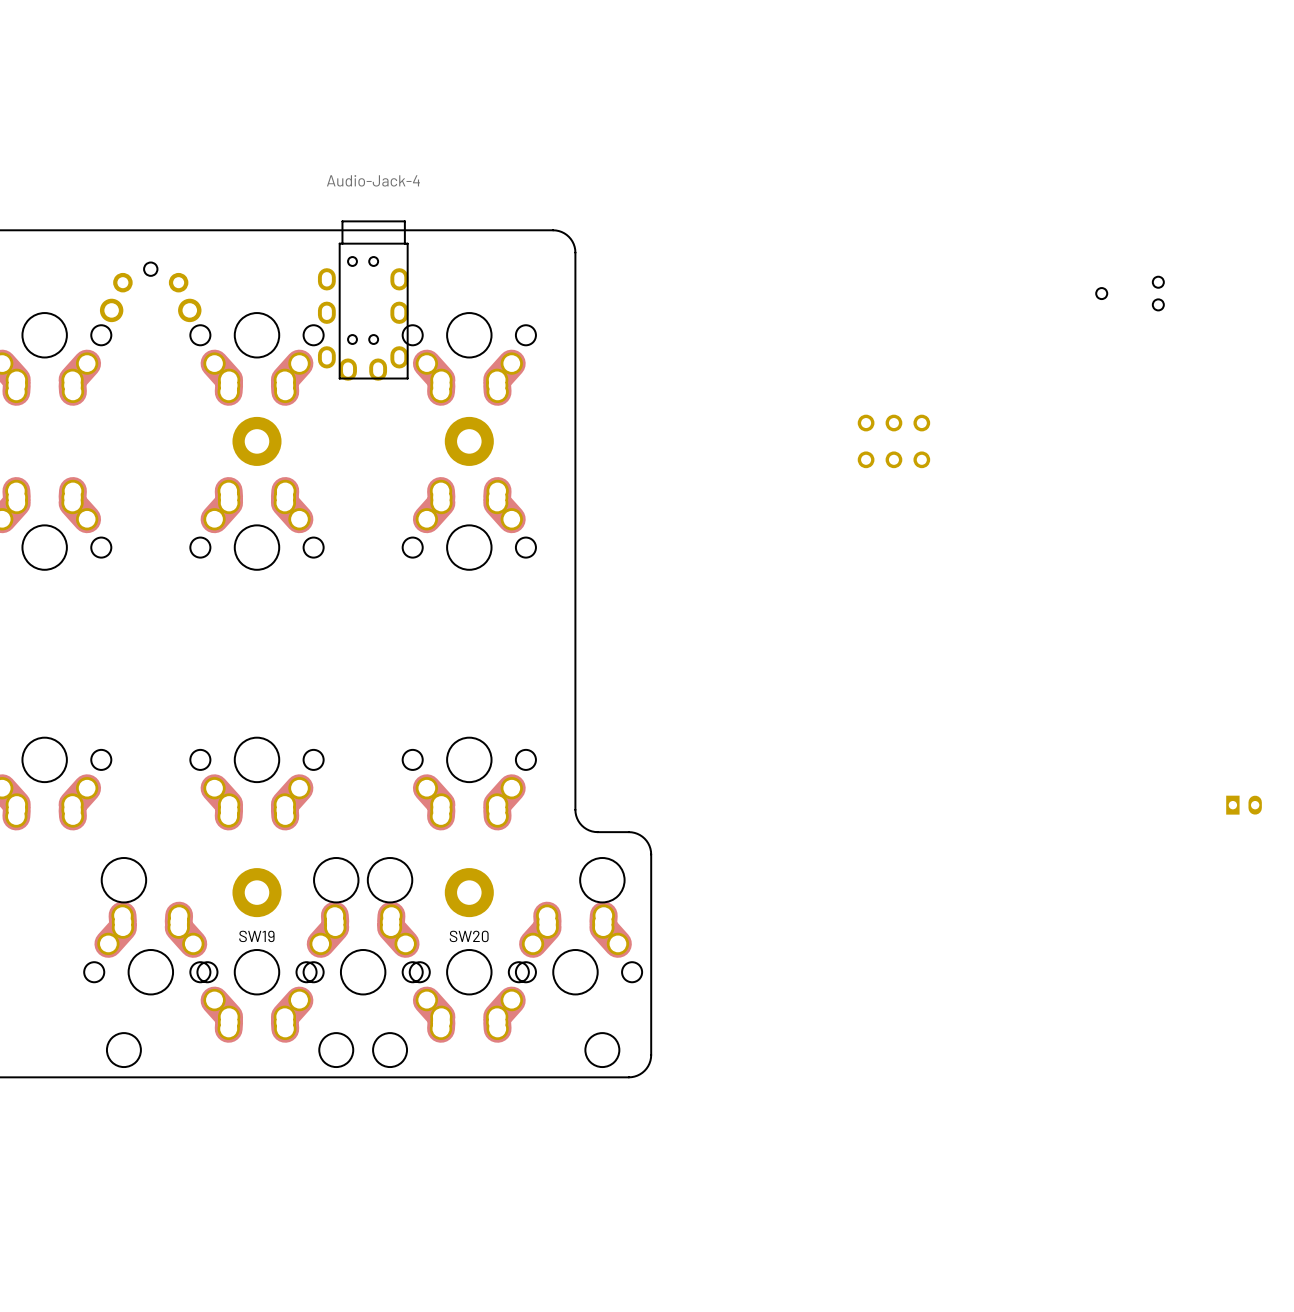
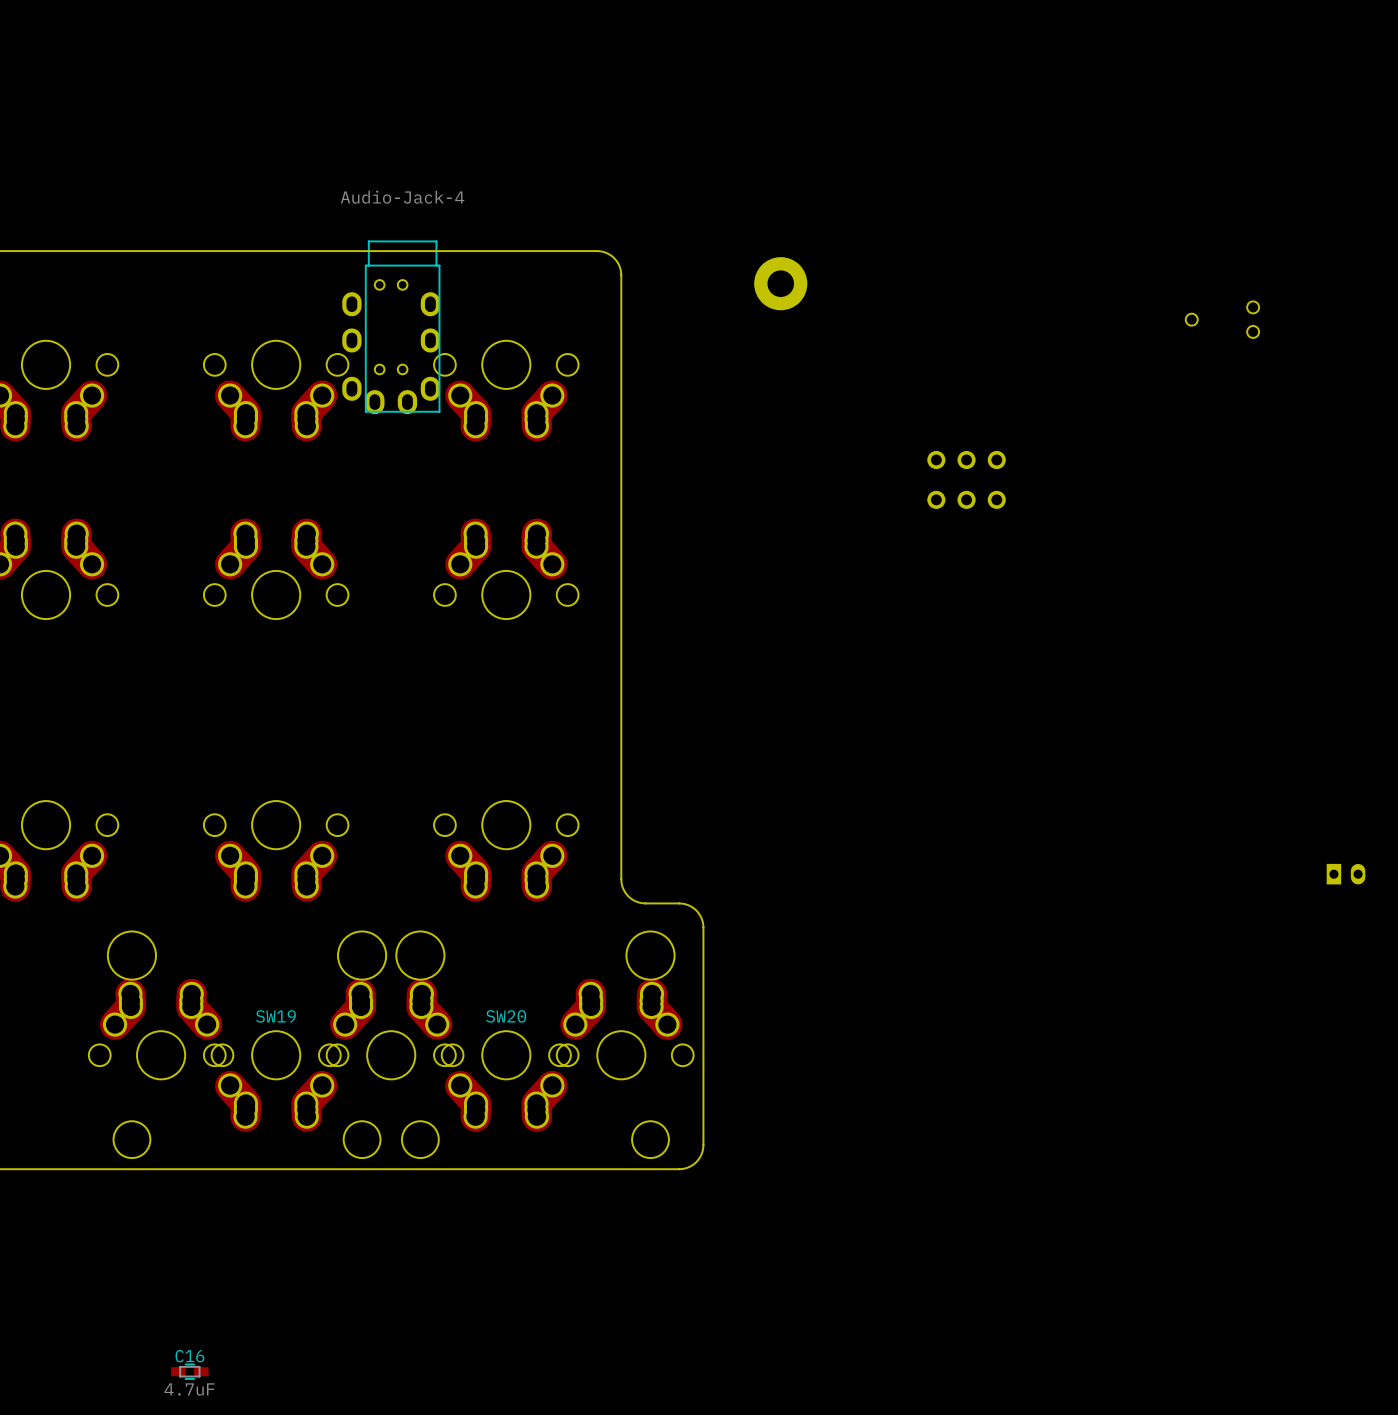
part: none -> (780, 283)
part: (150, 292) -> none
part: (256, 441) -> none
part: (469, 441) -> none
part: (256, 892) -> none
part: (469, 892) -> none
C16: none -> 4.7uF (189, 1371)

